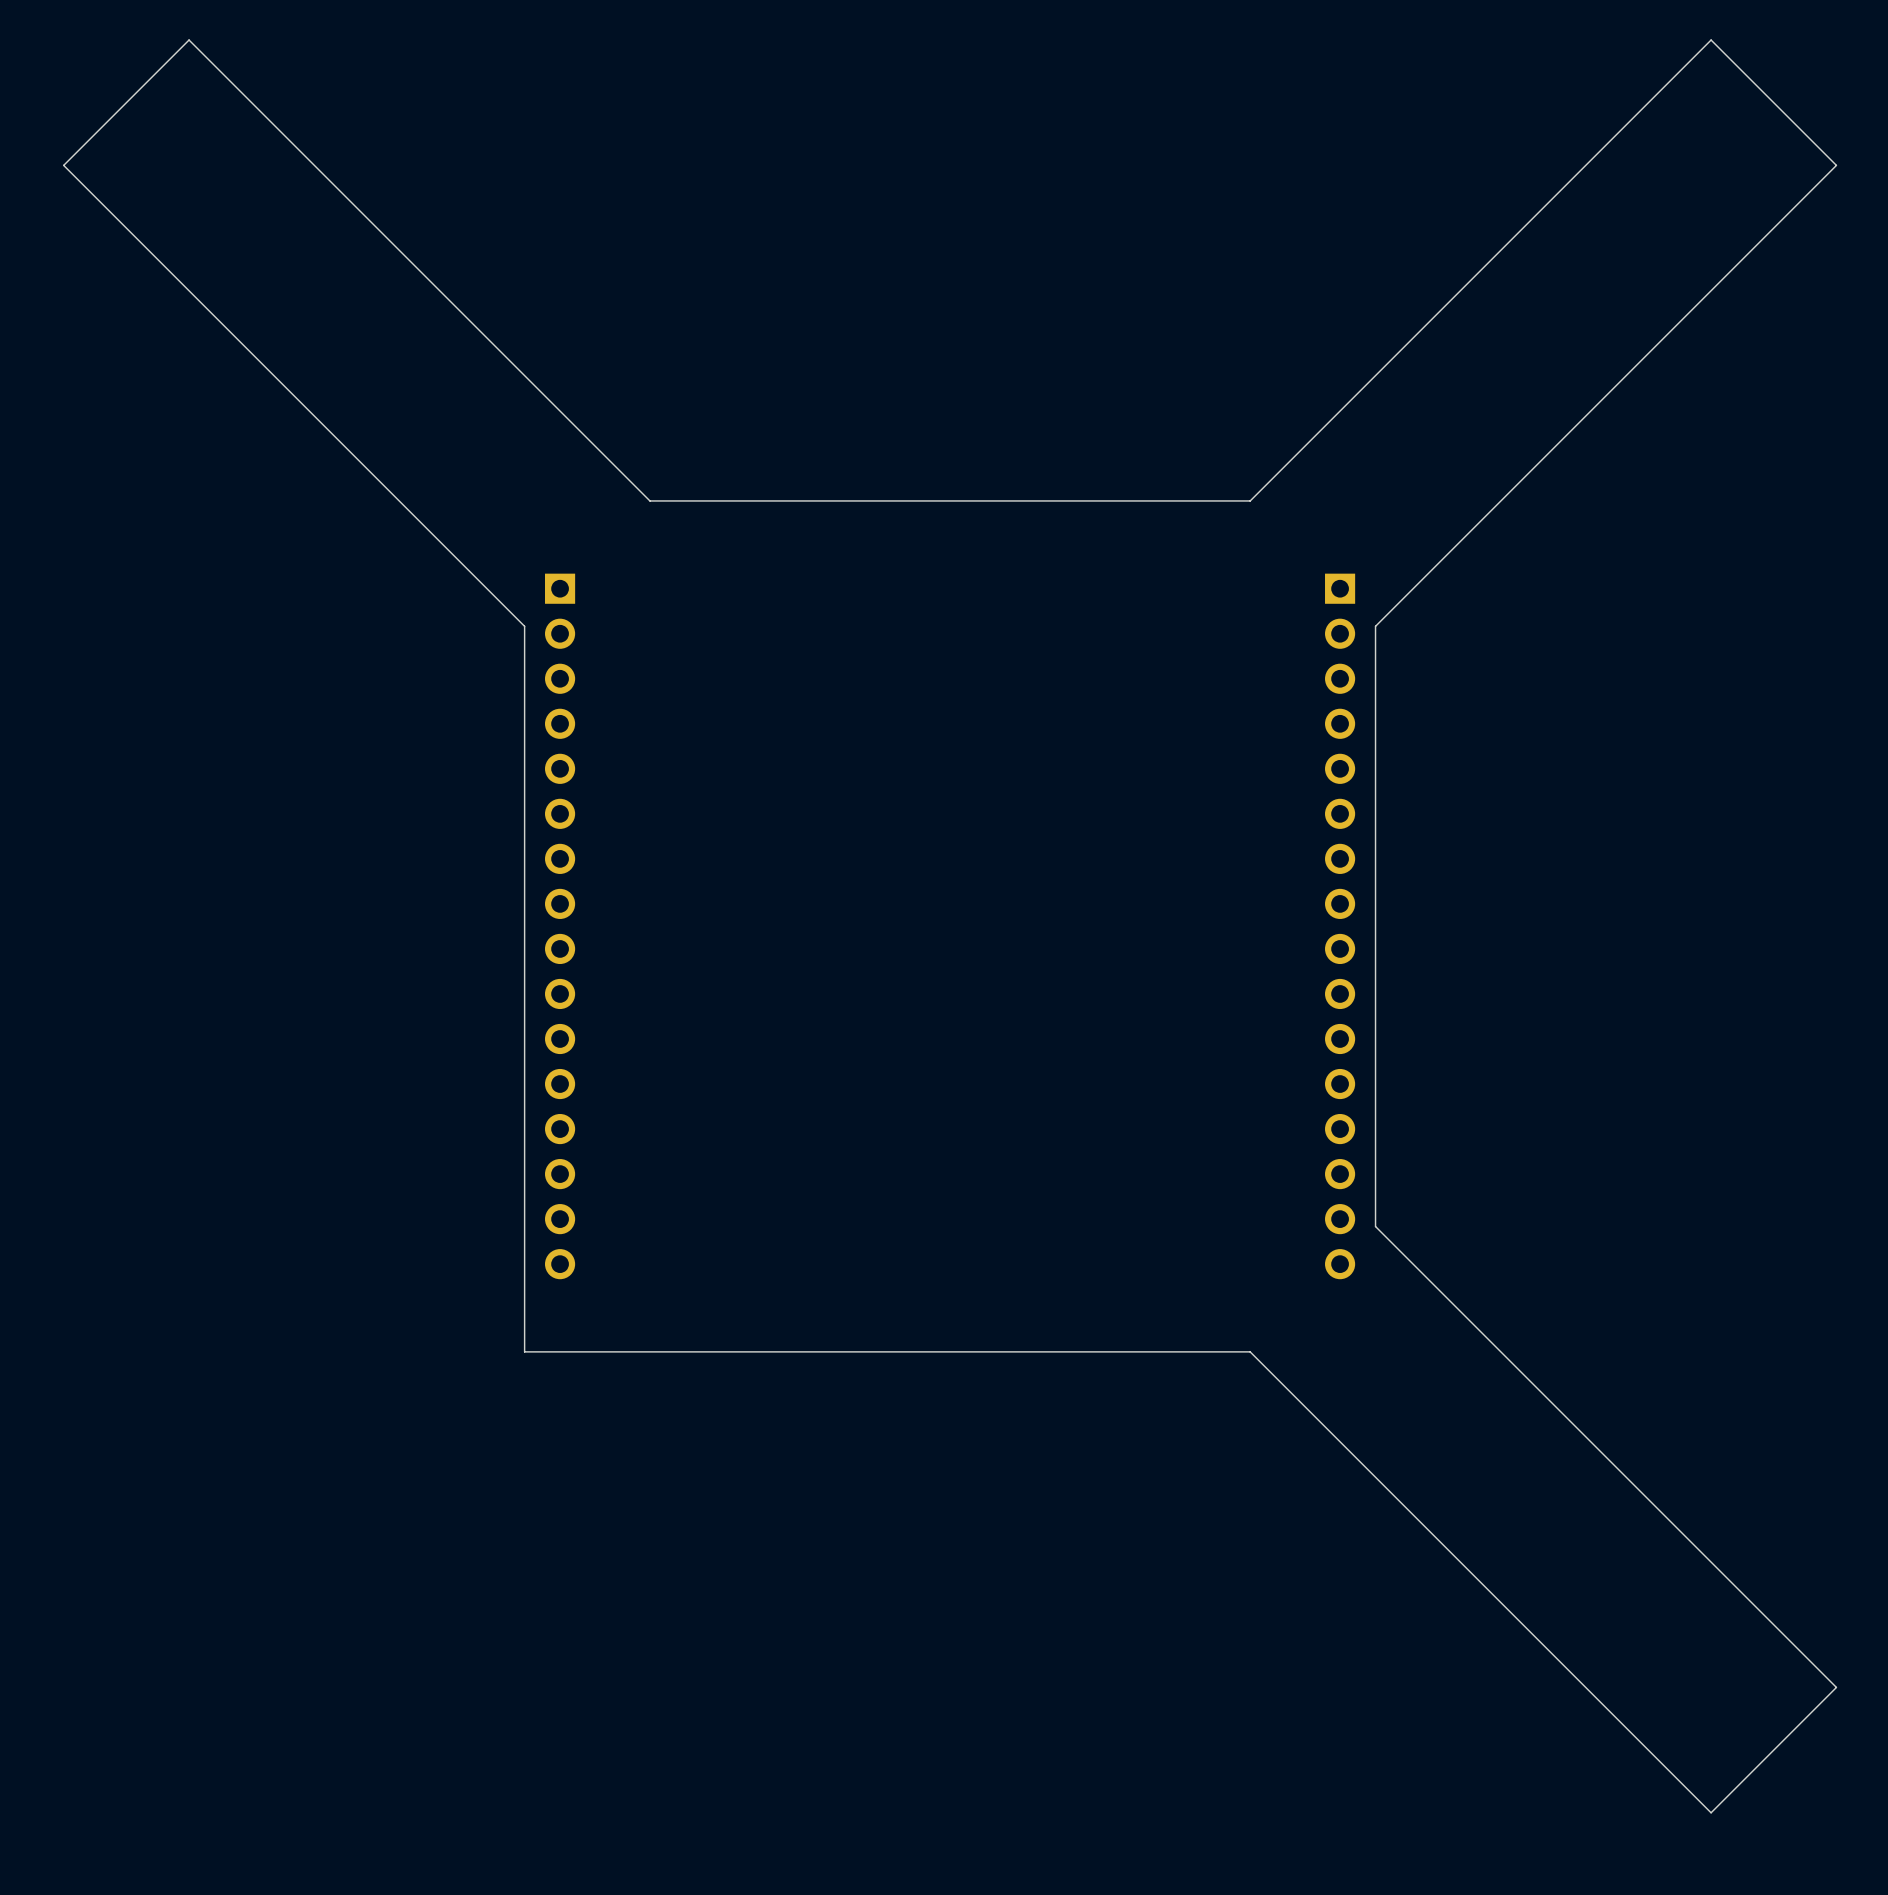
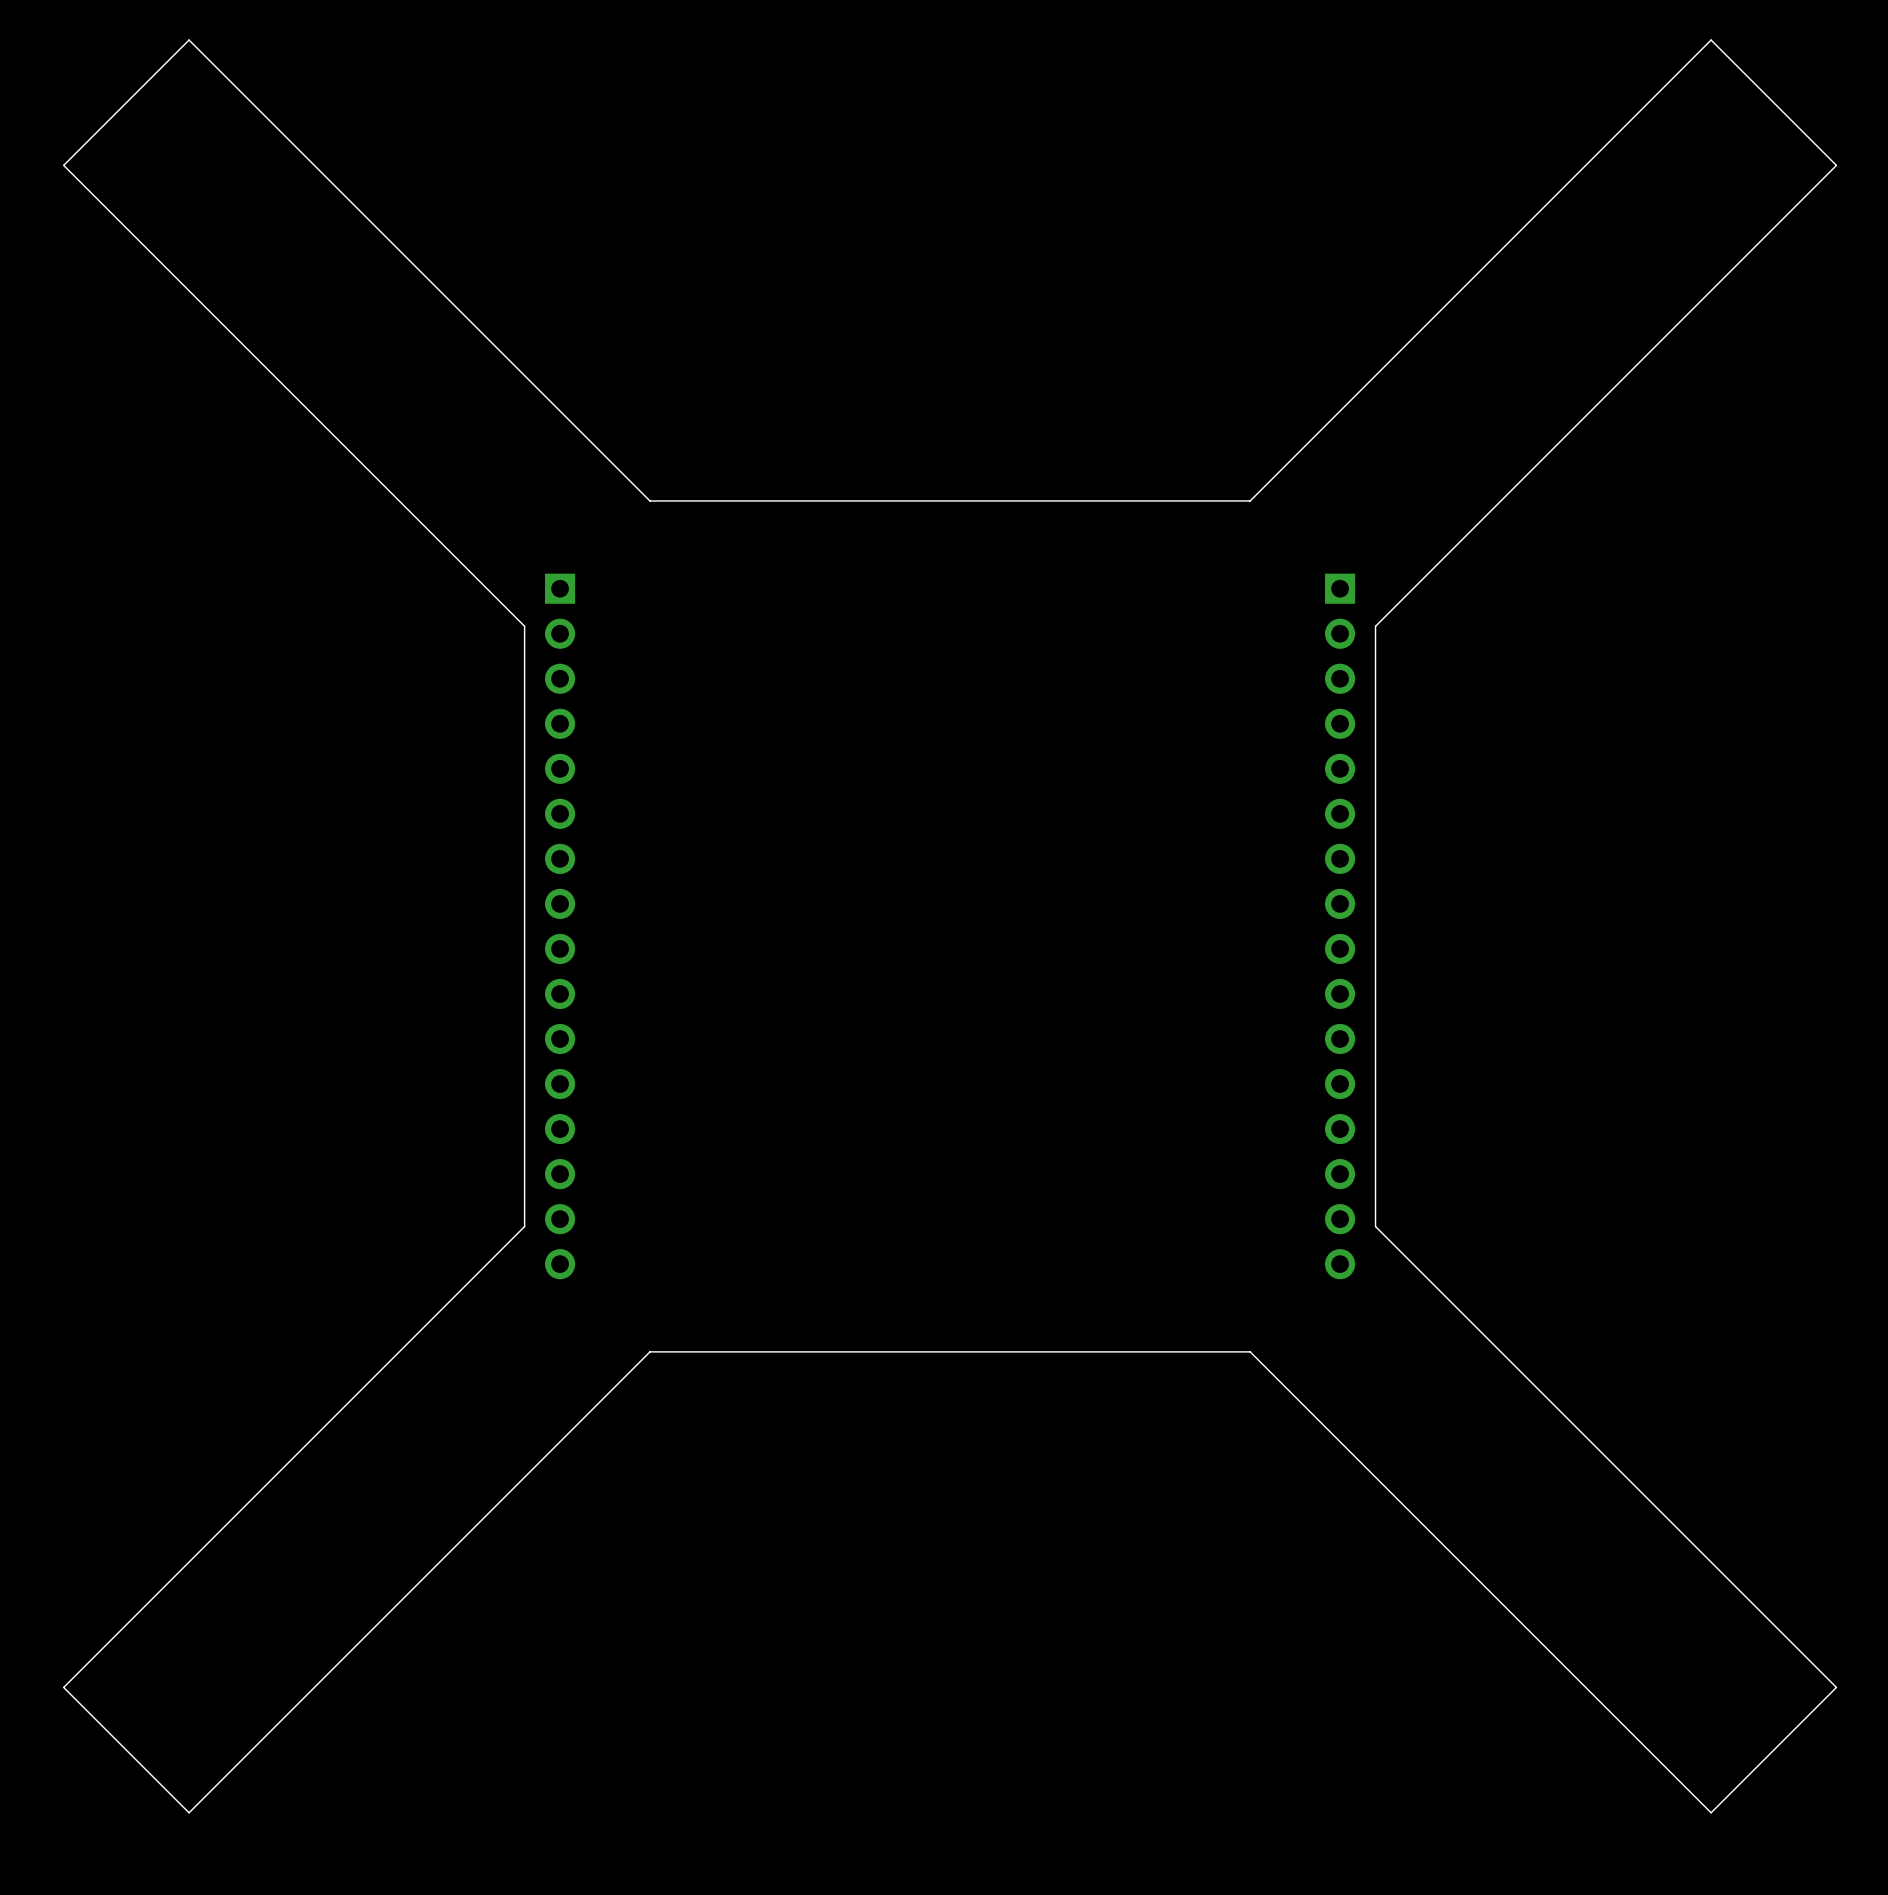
board edge: (524, 1226) (524, 1351) (649, 1351) -> (524, 1226) (63, 1687) (189, 1812) (649, 1351)

